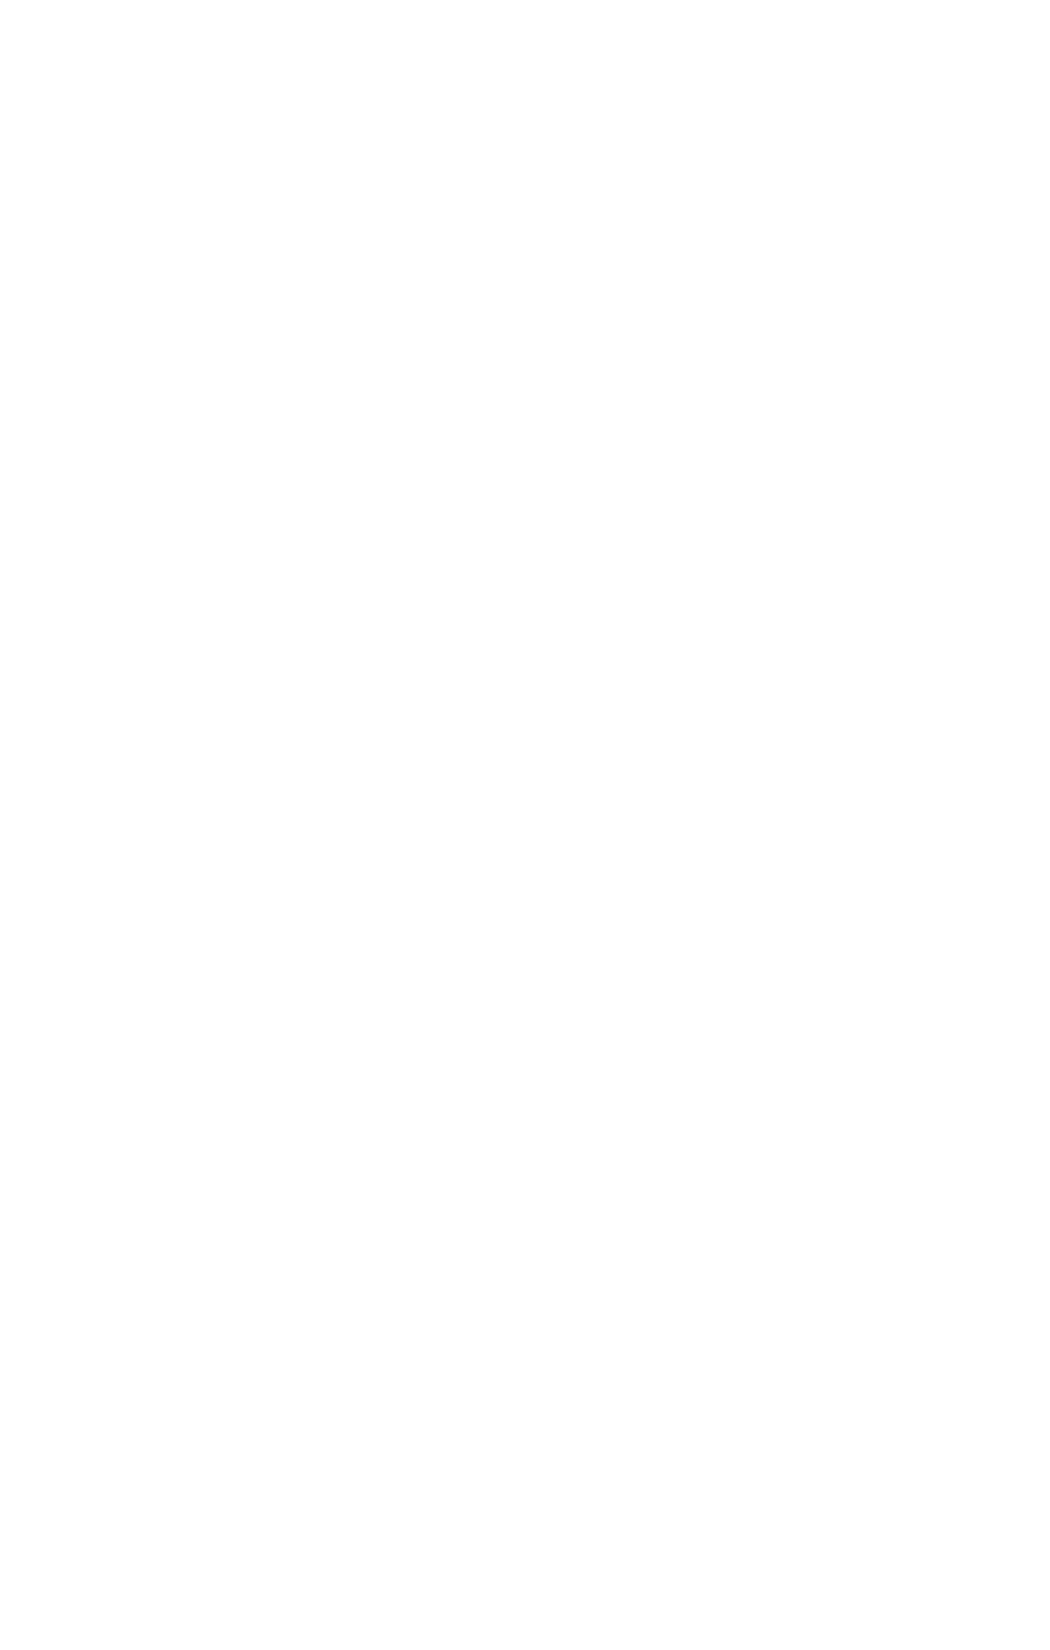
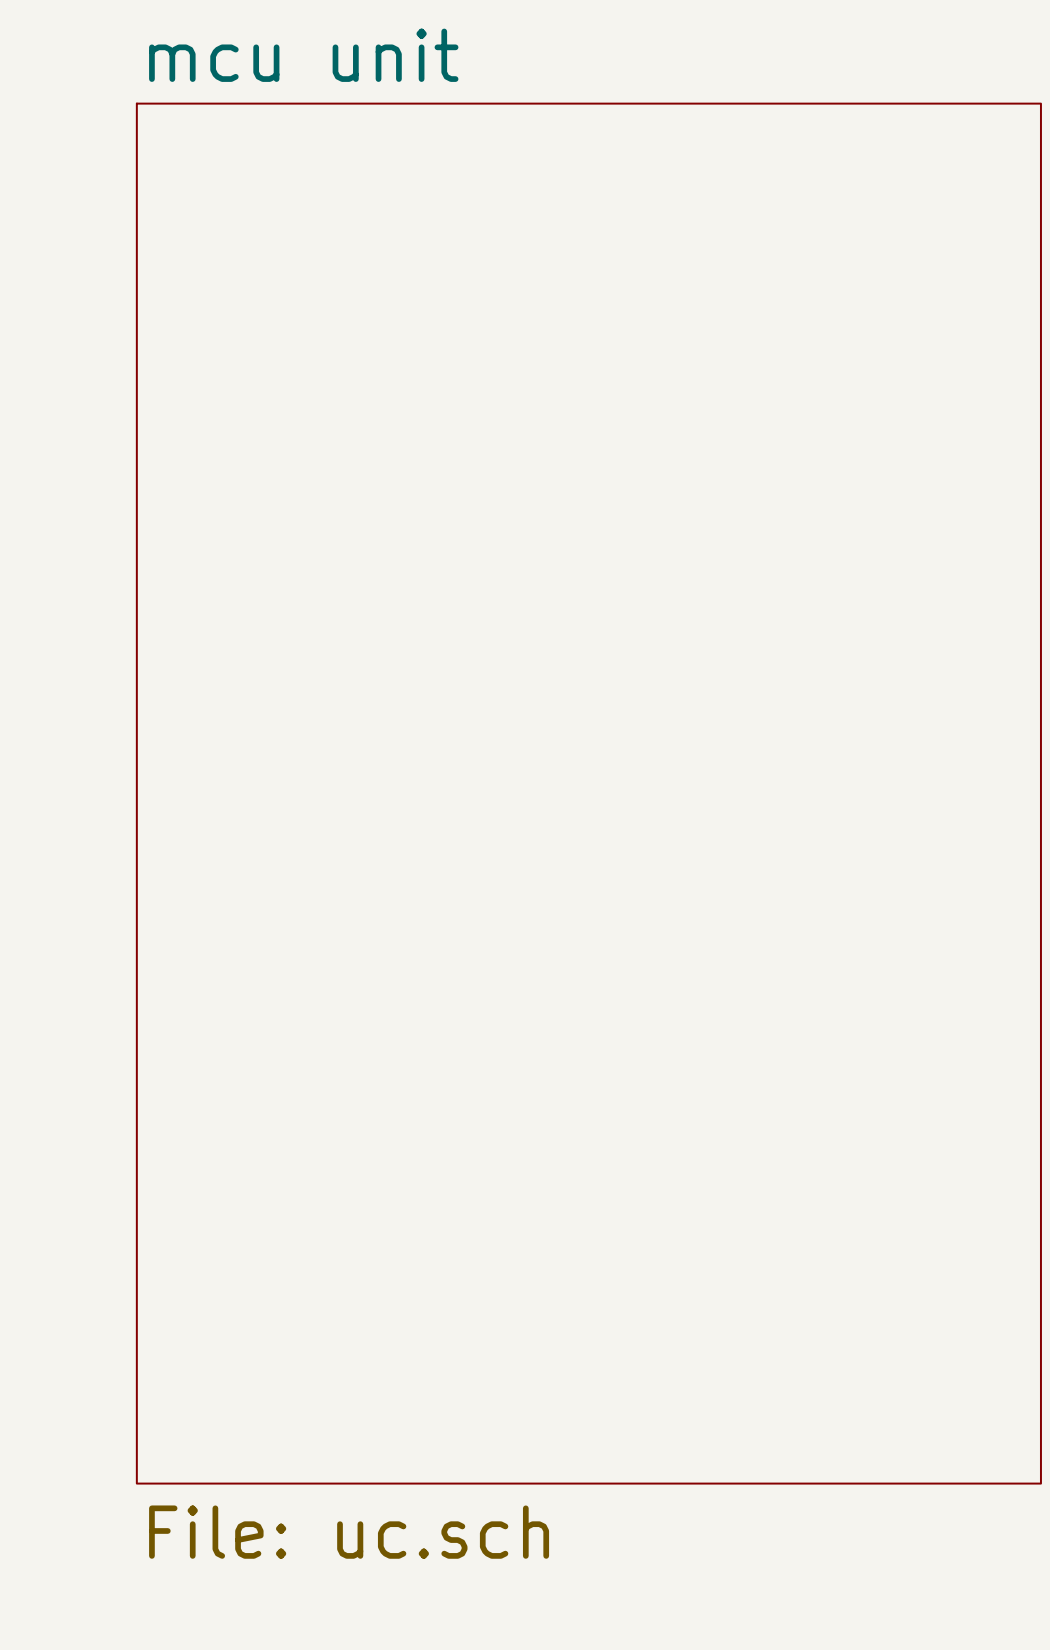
sheet mcu unit: none -> File: uc.sch (588, 793)

